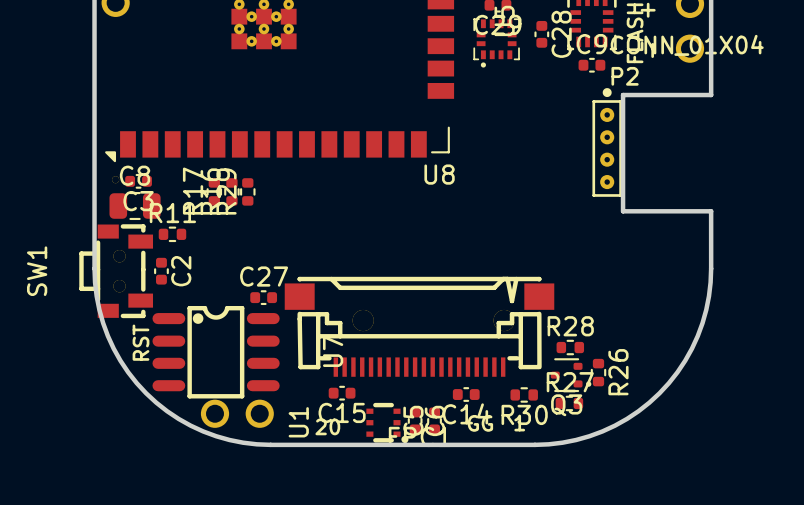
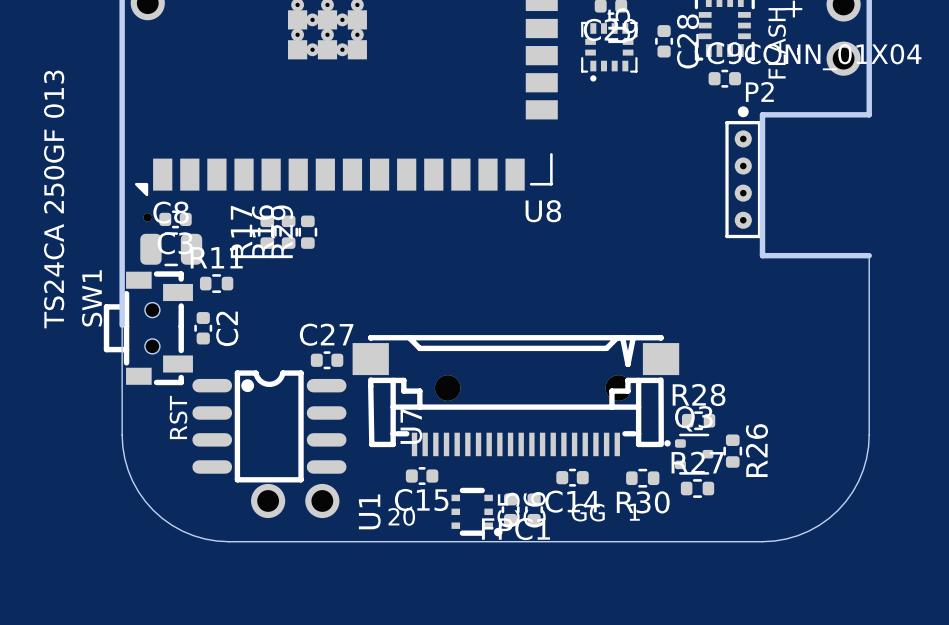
SW1 value: none -> TS24CA 250GF 013 (54, 199)
board edge: (711, 211) (710, 282) (706, 309) (697, 336) (677, 372) (649, 402) (627, 418) (589, 436) (548, 444) (270, 444) (229, 440) (203, 431) (167, 411) (146, 393) (128, 372) (113, 348) (103, 323) (96, 296) (94, 268) -> (869, 255) (869, 434) (863, 470) (852, 491) (829, 518) (808, 531) (774, 541) (228, 541) (193, 535) (172, 525) (153, 510) (138, 491) (128, 470) (122, 434) (122, 325)
SW1 footprint: [79, 224, 154, 319] -> [103, 271, 193, 386]
SW1 name position: SW1 (37, 271) -> SW1 (92, 298)
Q3 rotation: 0° (571, 375) -> 180° (688, 454)

